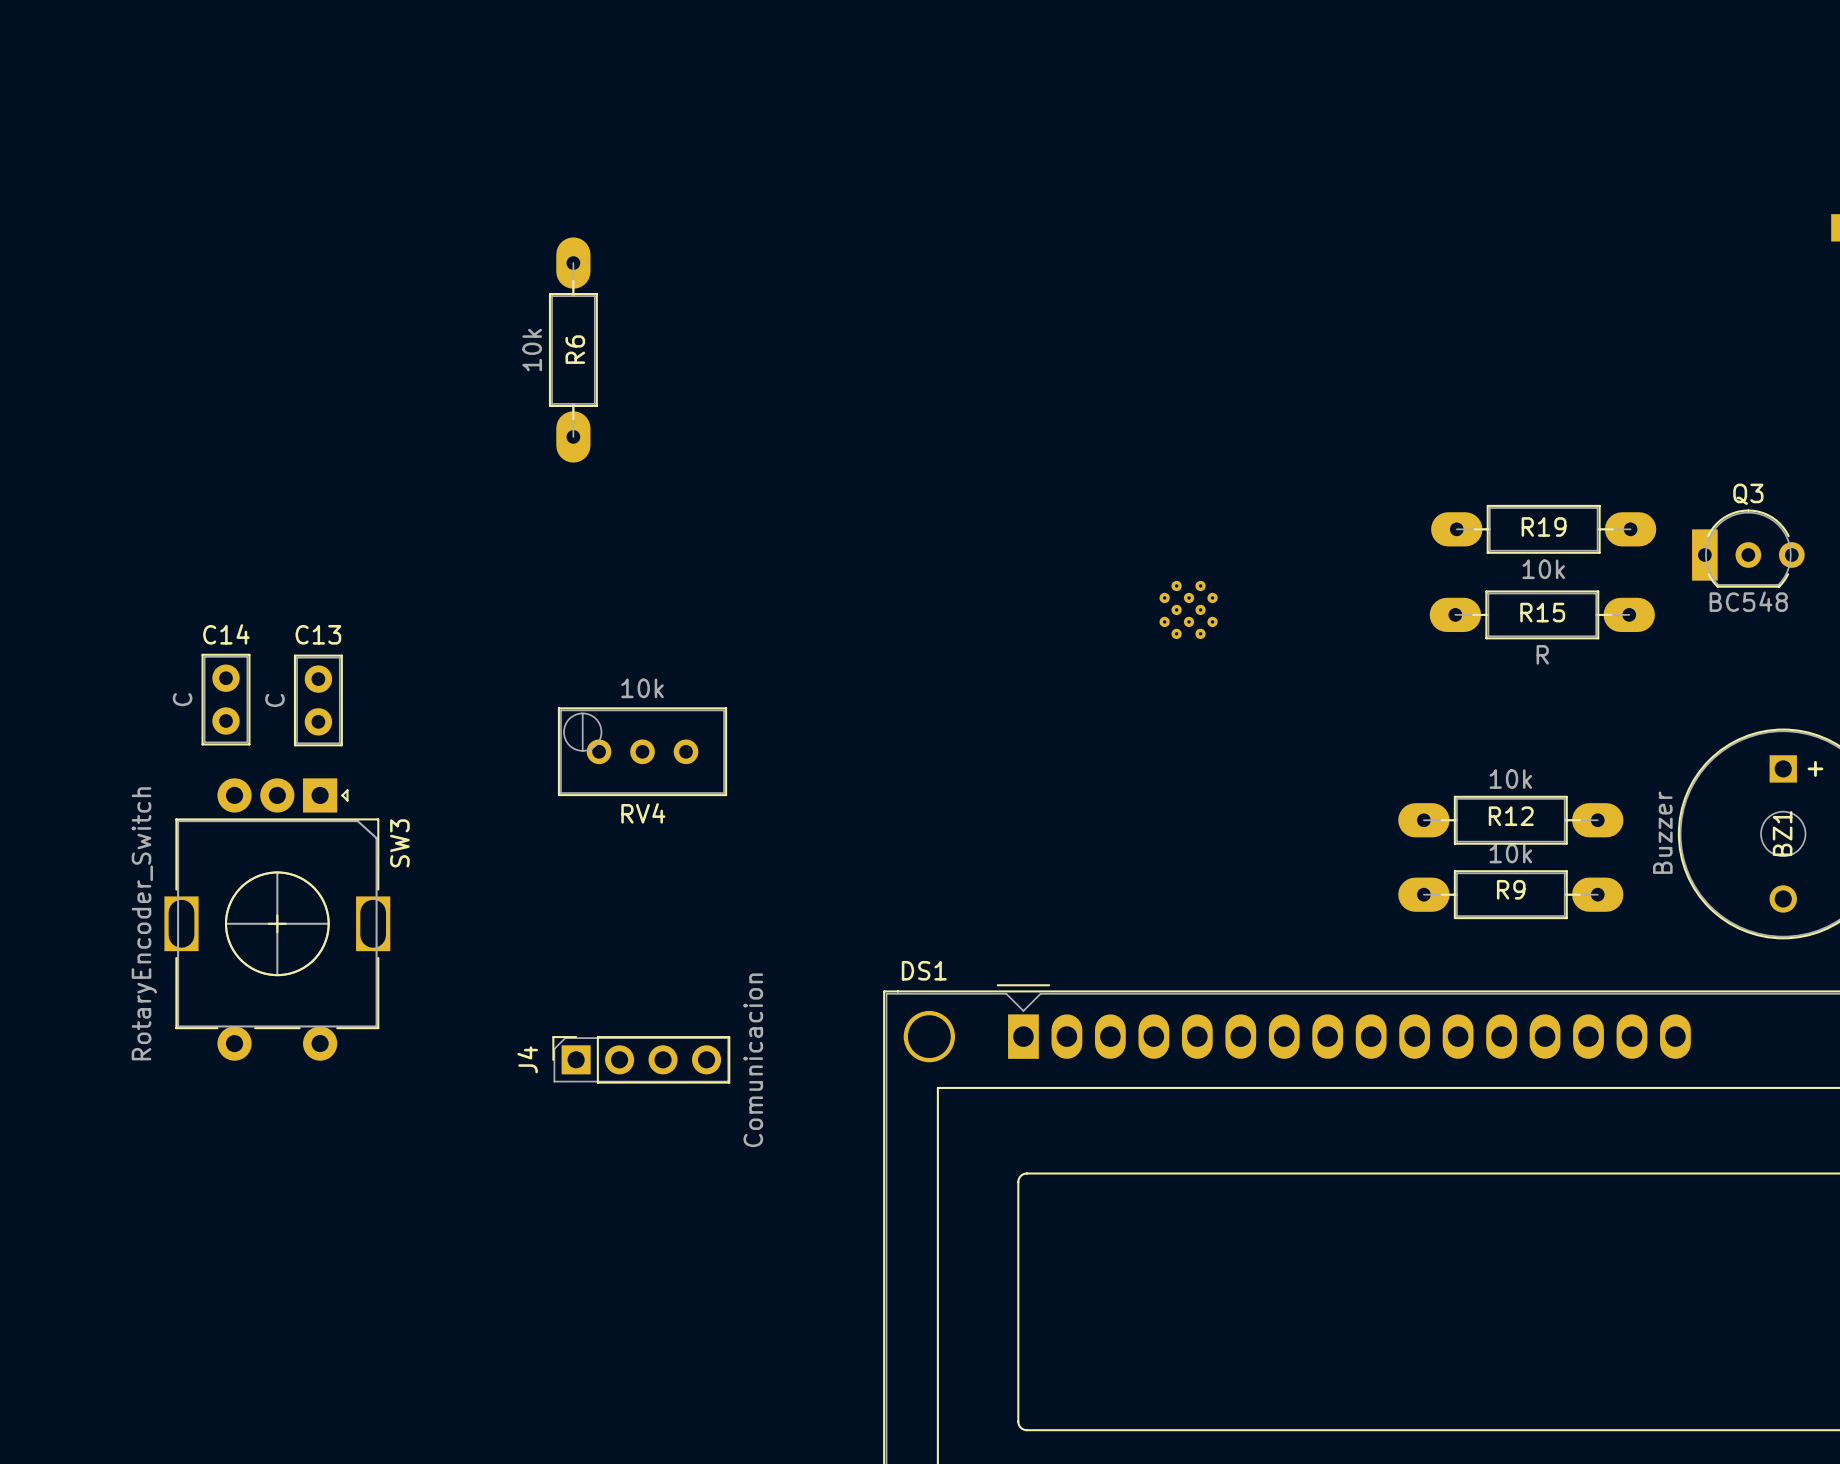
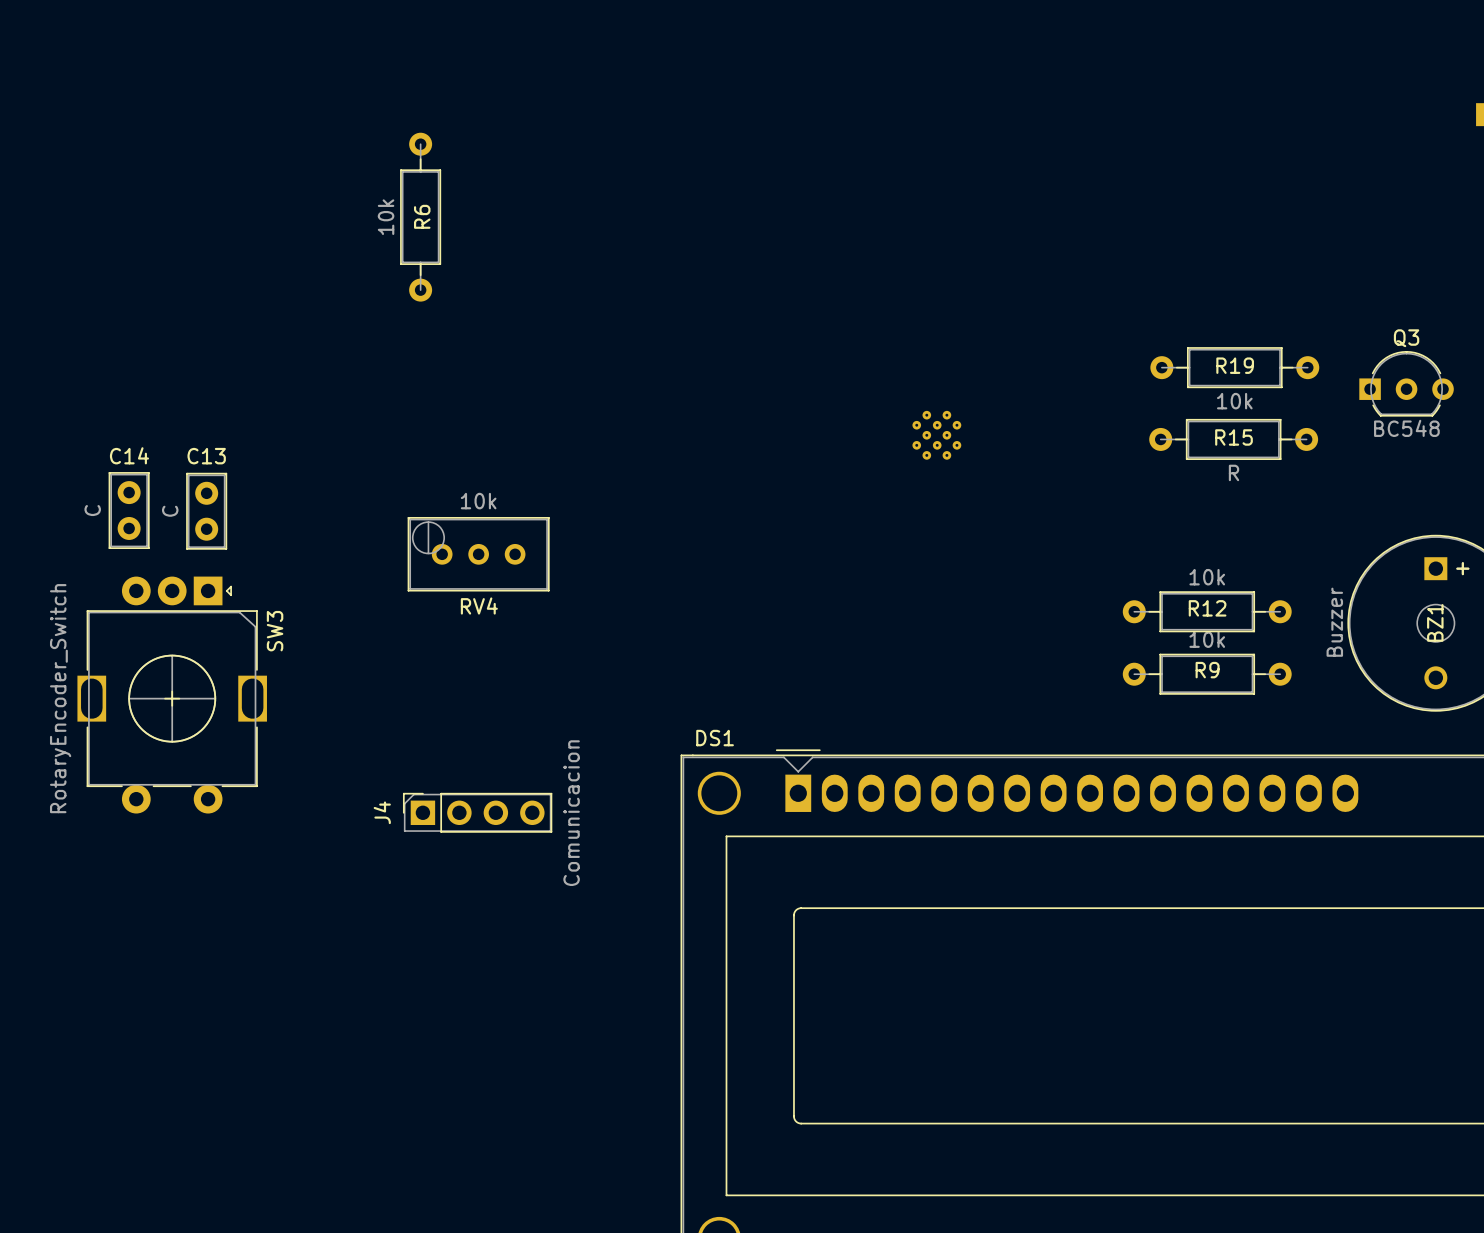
R6 footprint: [548, 237, 598, 463] -> [400, 132, 442, 302]
R19 footprint: [1431, 504, 1657, 554] -> [1150, 347, 1320, 389]
Q3 footprint: [1692, 509, 1805, 588] -> [1359, 350, 1454, 417]
R15 footprint: [1429, 590, 1655, 640] -> [1149, 418, 1319, 460]
R12 footprint: [1398, 795, 1624, 845] -> [1122, 591, 1292, 633]
R9 footprint: [1398, 870, 1624, 920] -> [1122, 653, 1292, 695]

